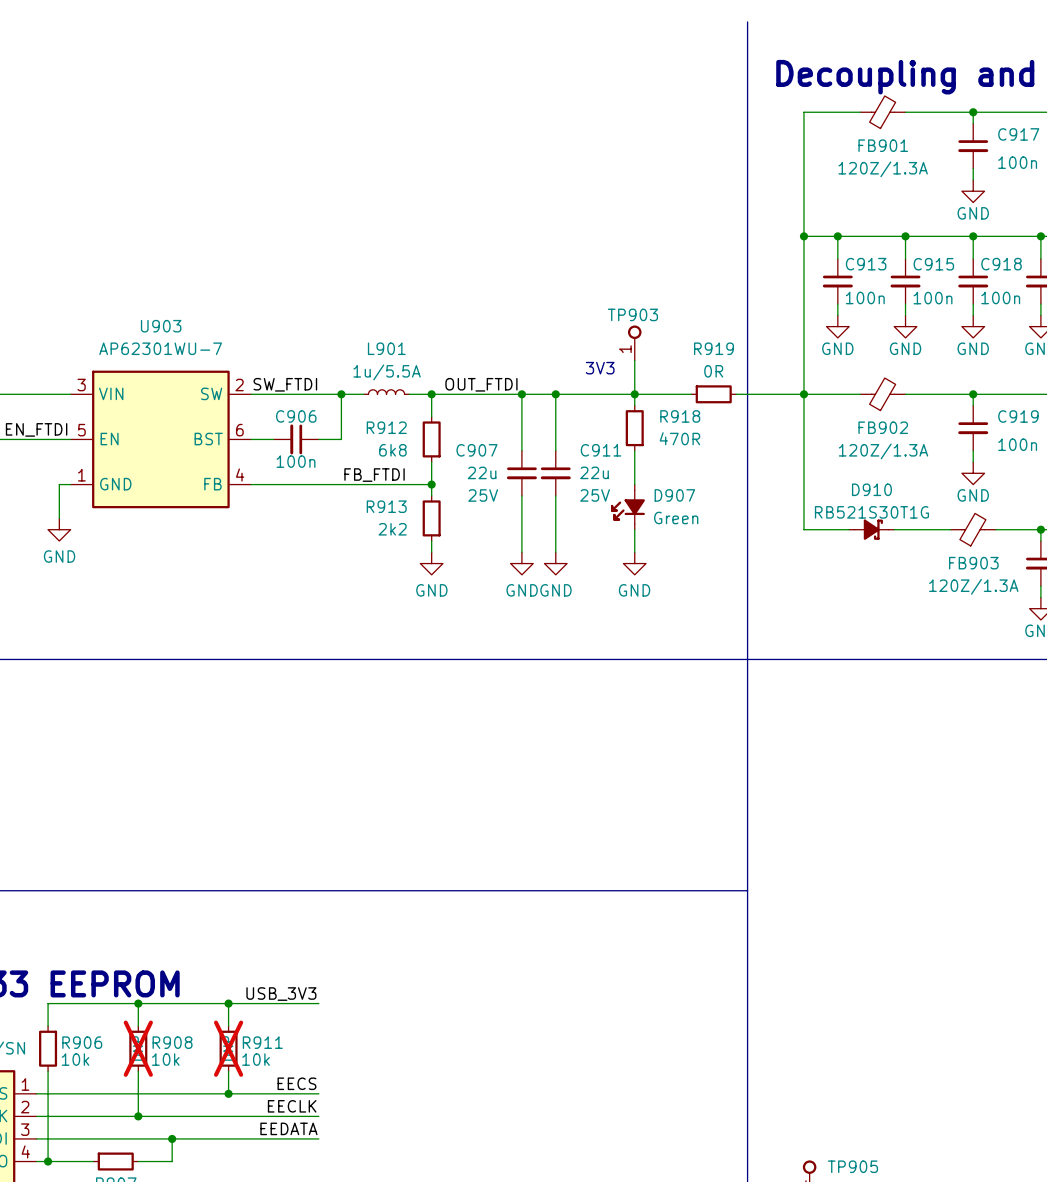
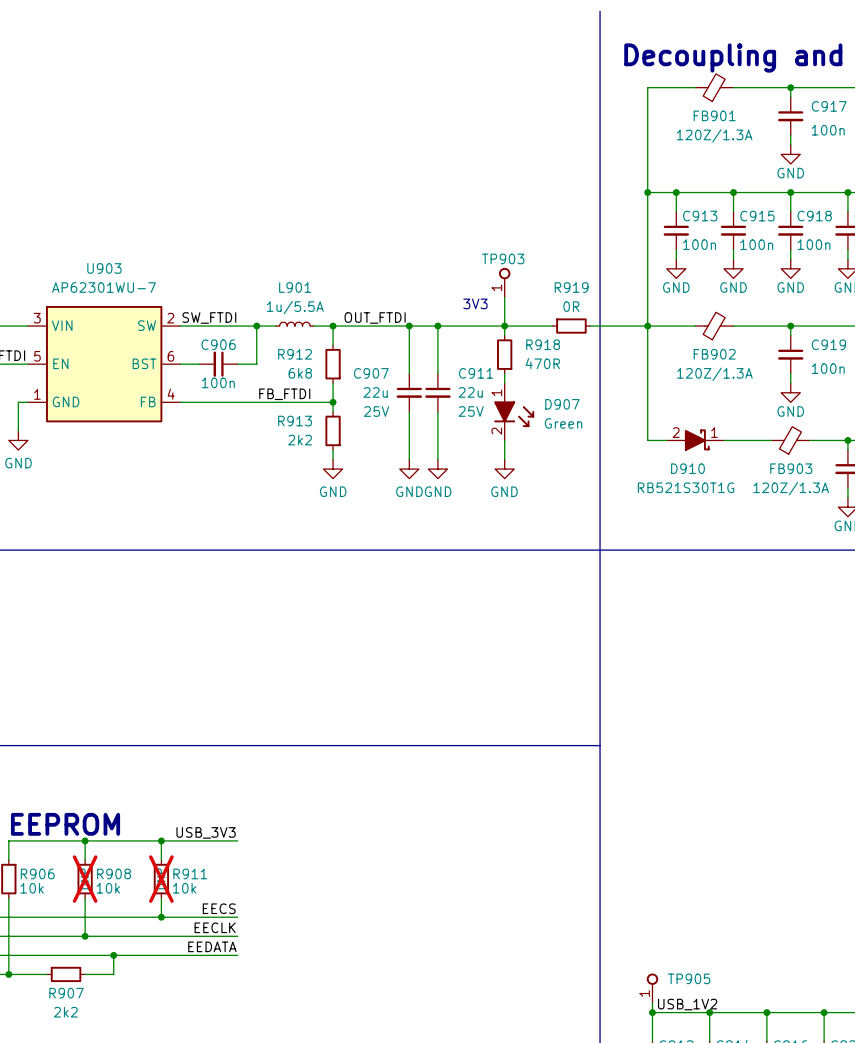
D907 symbol: [611, 484, 645, 530] -> [494, 383, 535, 441]
D910 name position: D910 (871, 489) -> D910 (687, 468)
D910 text position: RB521S30T1G (871, 512) -> RB521S30T1G (686, 487)
D910 symbol: [849, 519, 895, 540] -> [666, 429, 724, 451]

